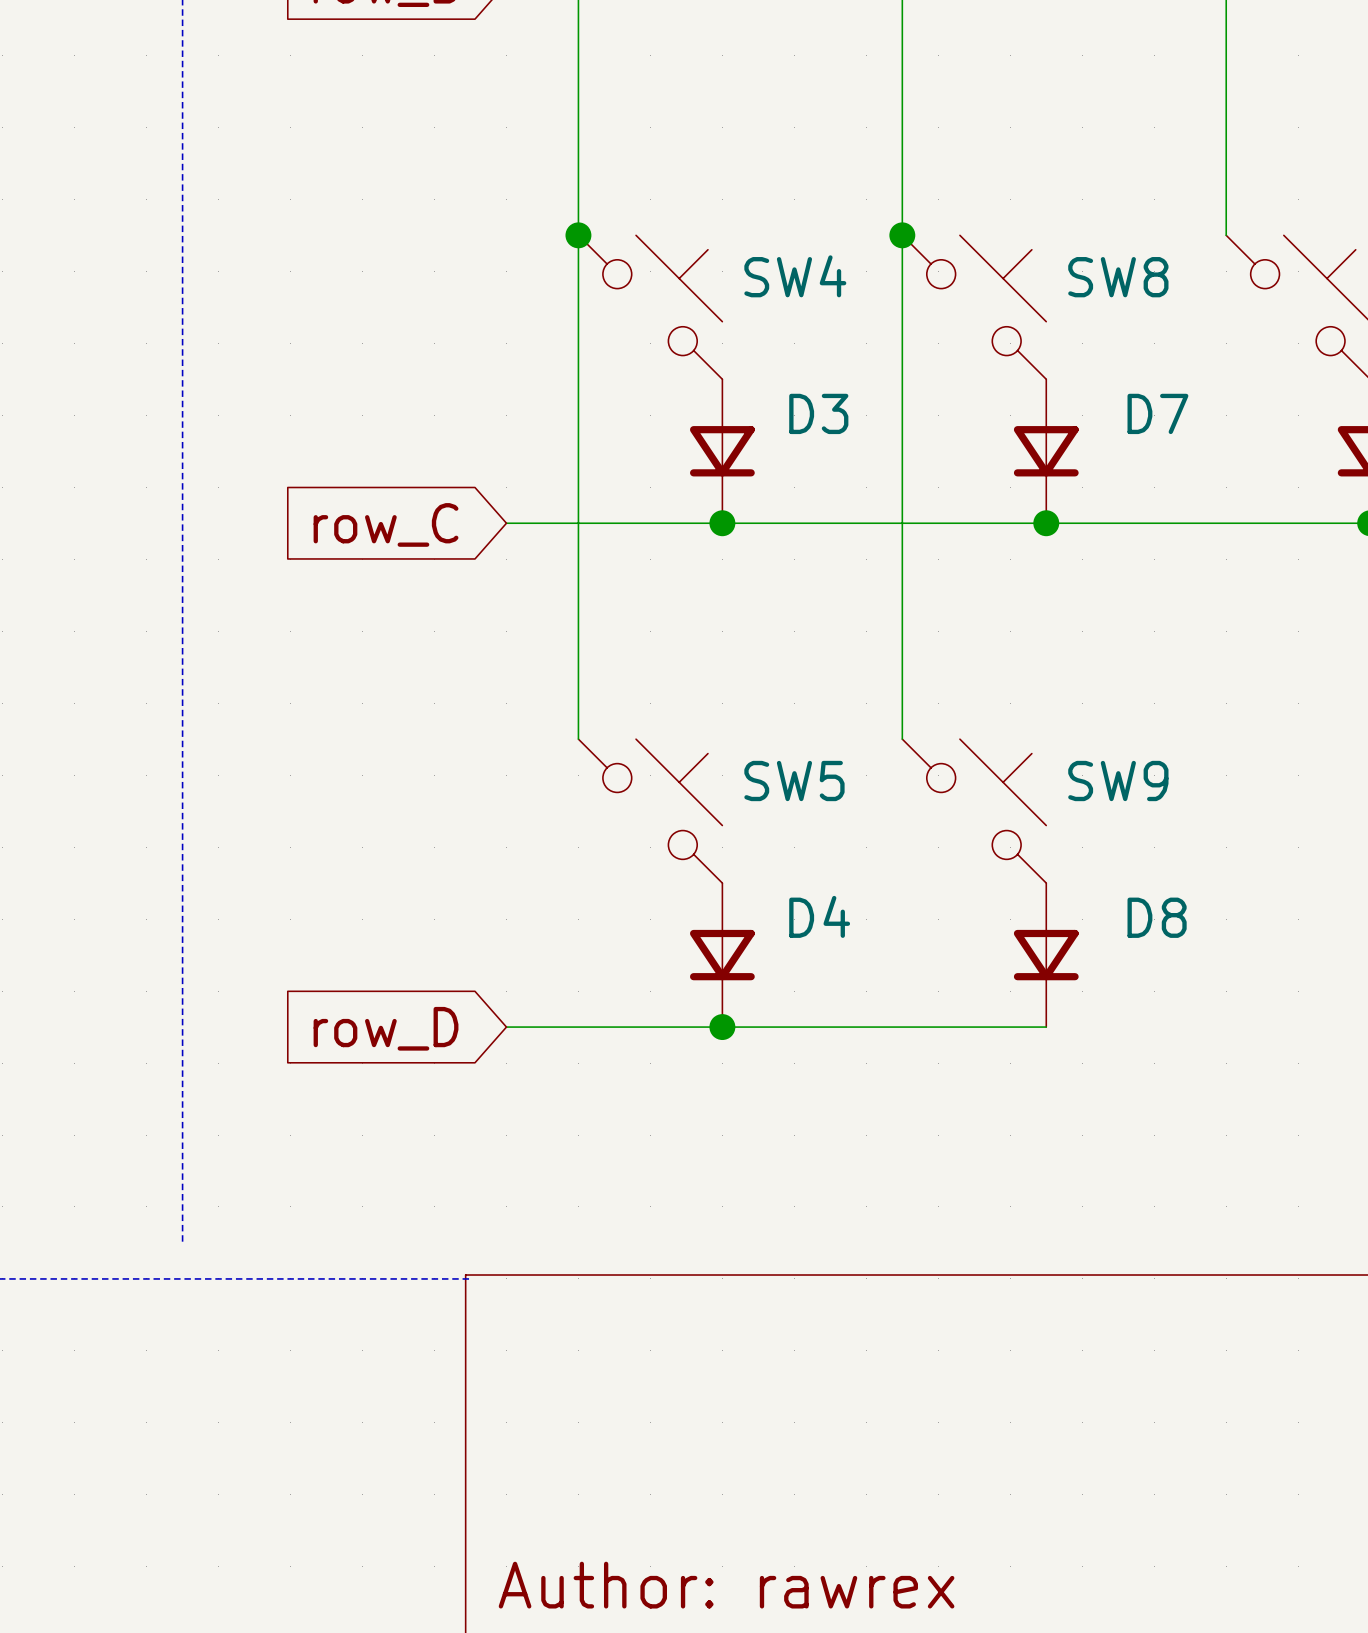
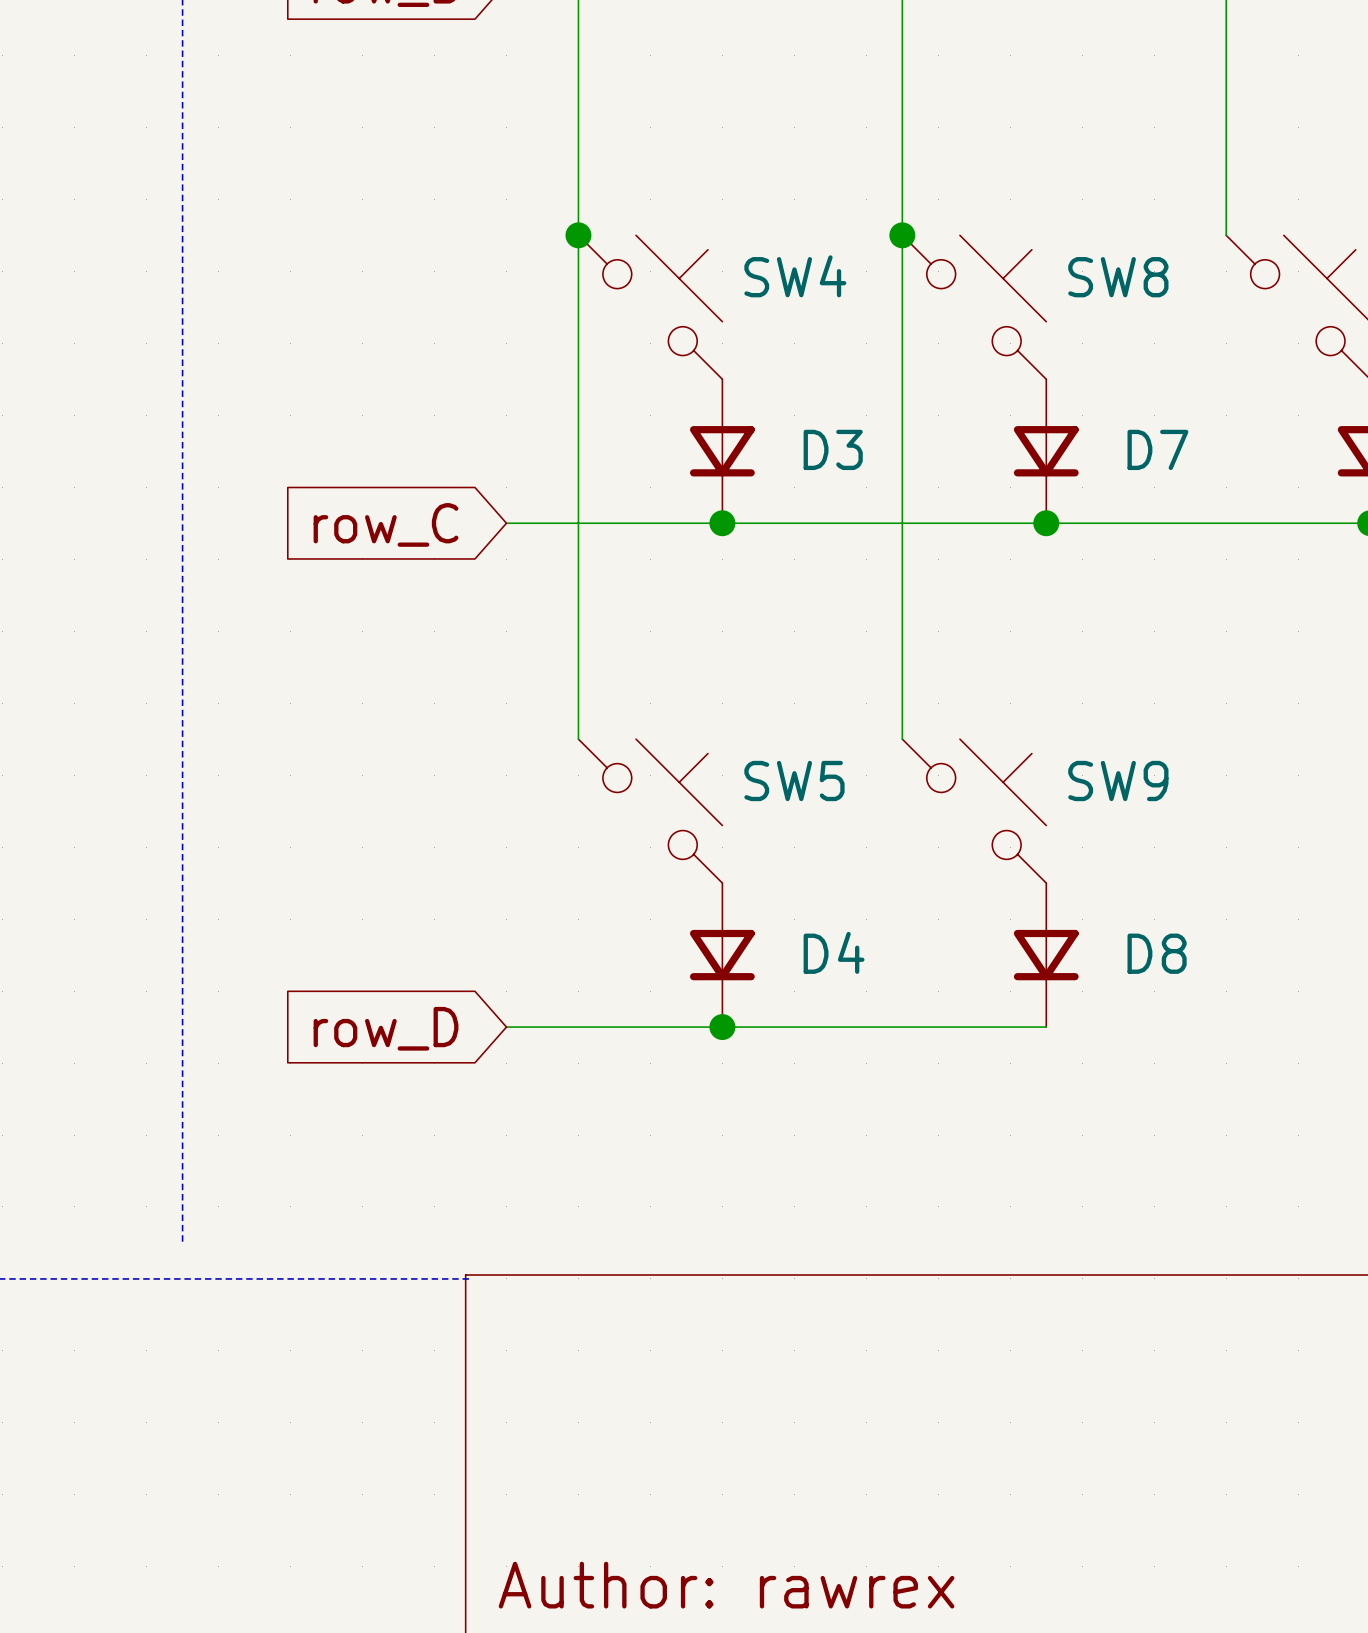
D3 name position: D3 (818, 413) -> D3 (833, 449)
D7 name position: D7 (1157, 413) -> D7 (1157, 449)
D4 name position: D4 (819, 916) -> D4 (834, 952)
D8 name position: D8 (1157, 917) -> D8 (1157, 953)

